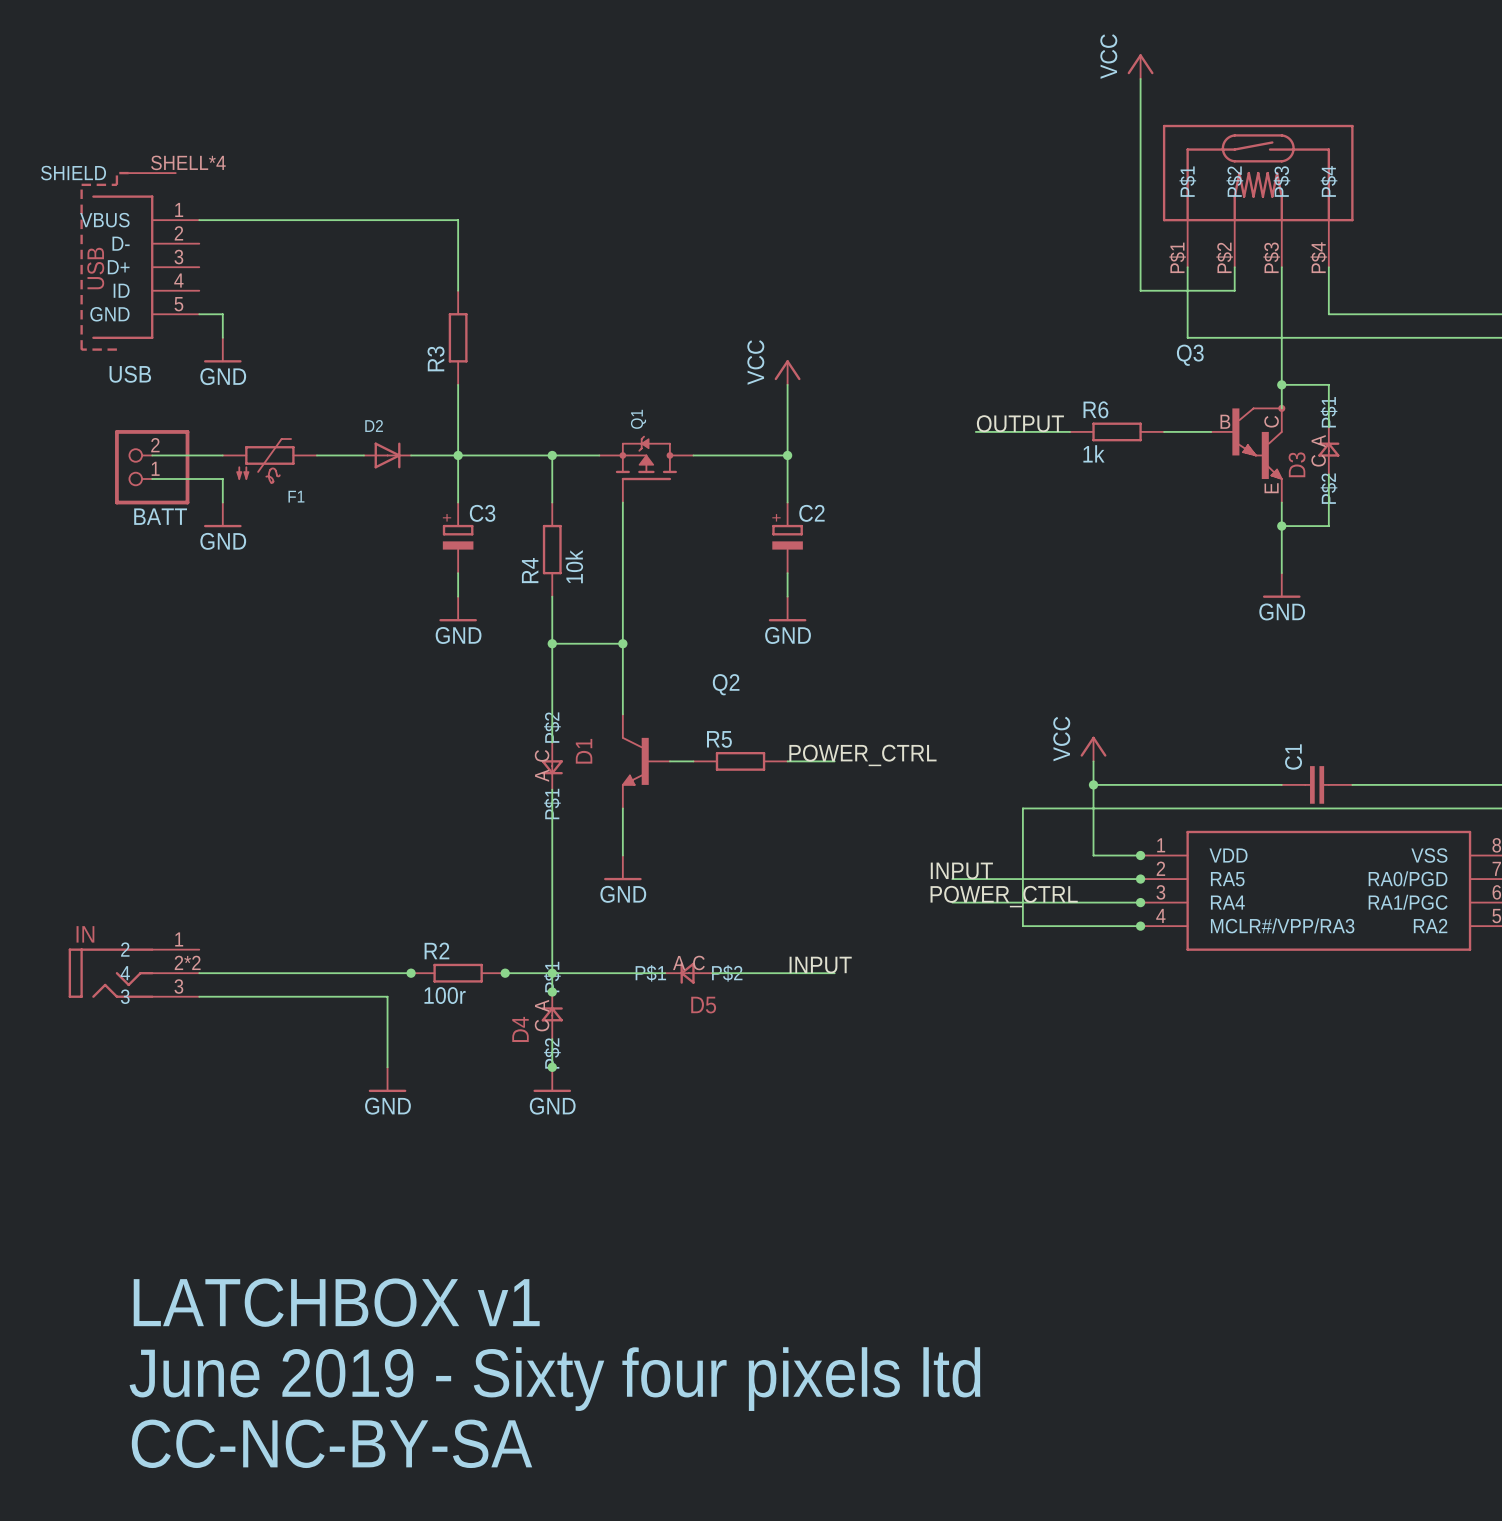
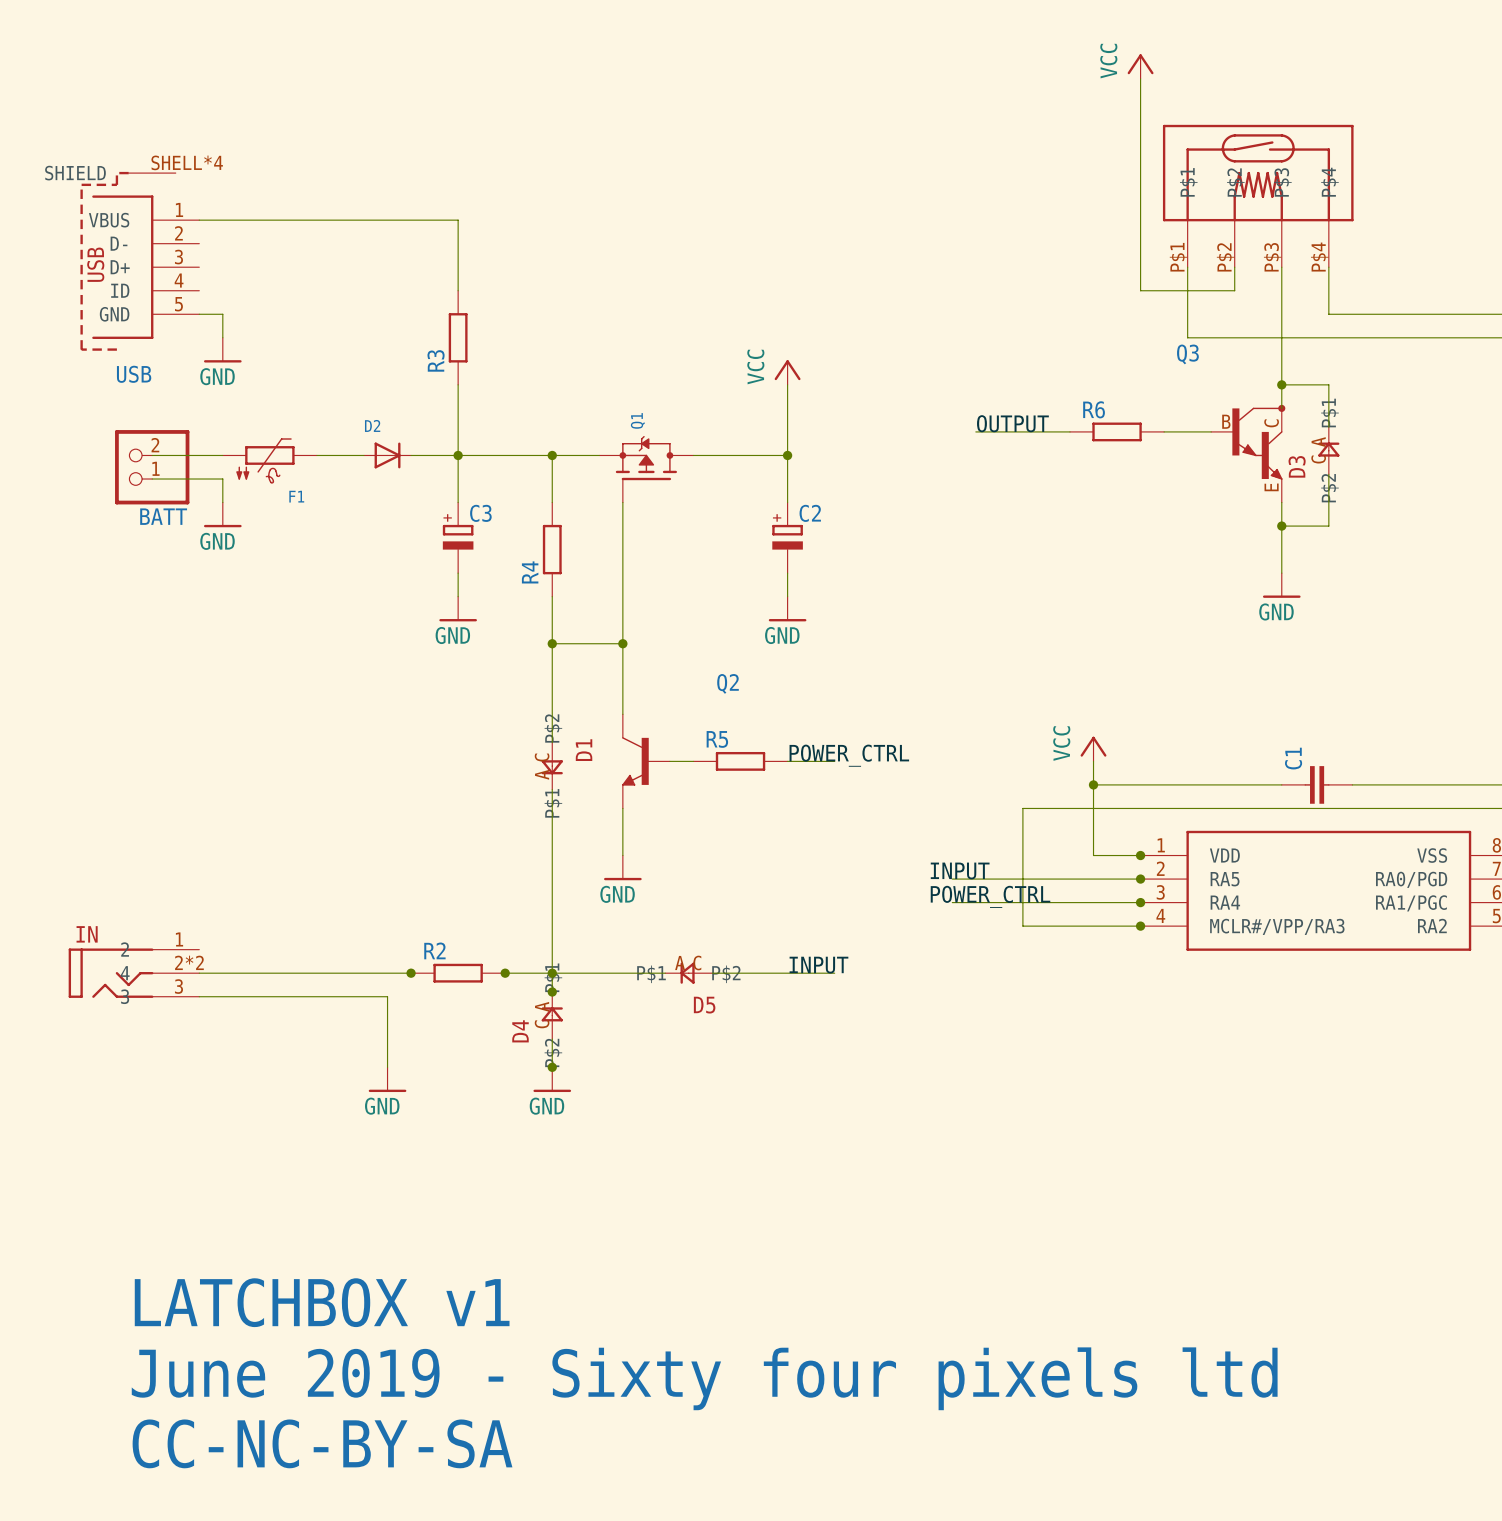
R6 value: 1k (1093, 453) -> none
R4 value: 10k (574, 566) -> none
R2 value: 100r (445, 995) -> none

